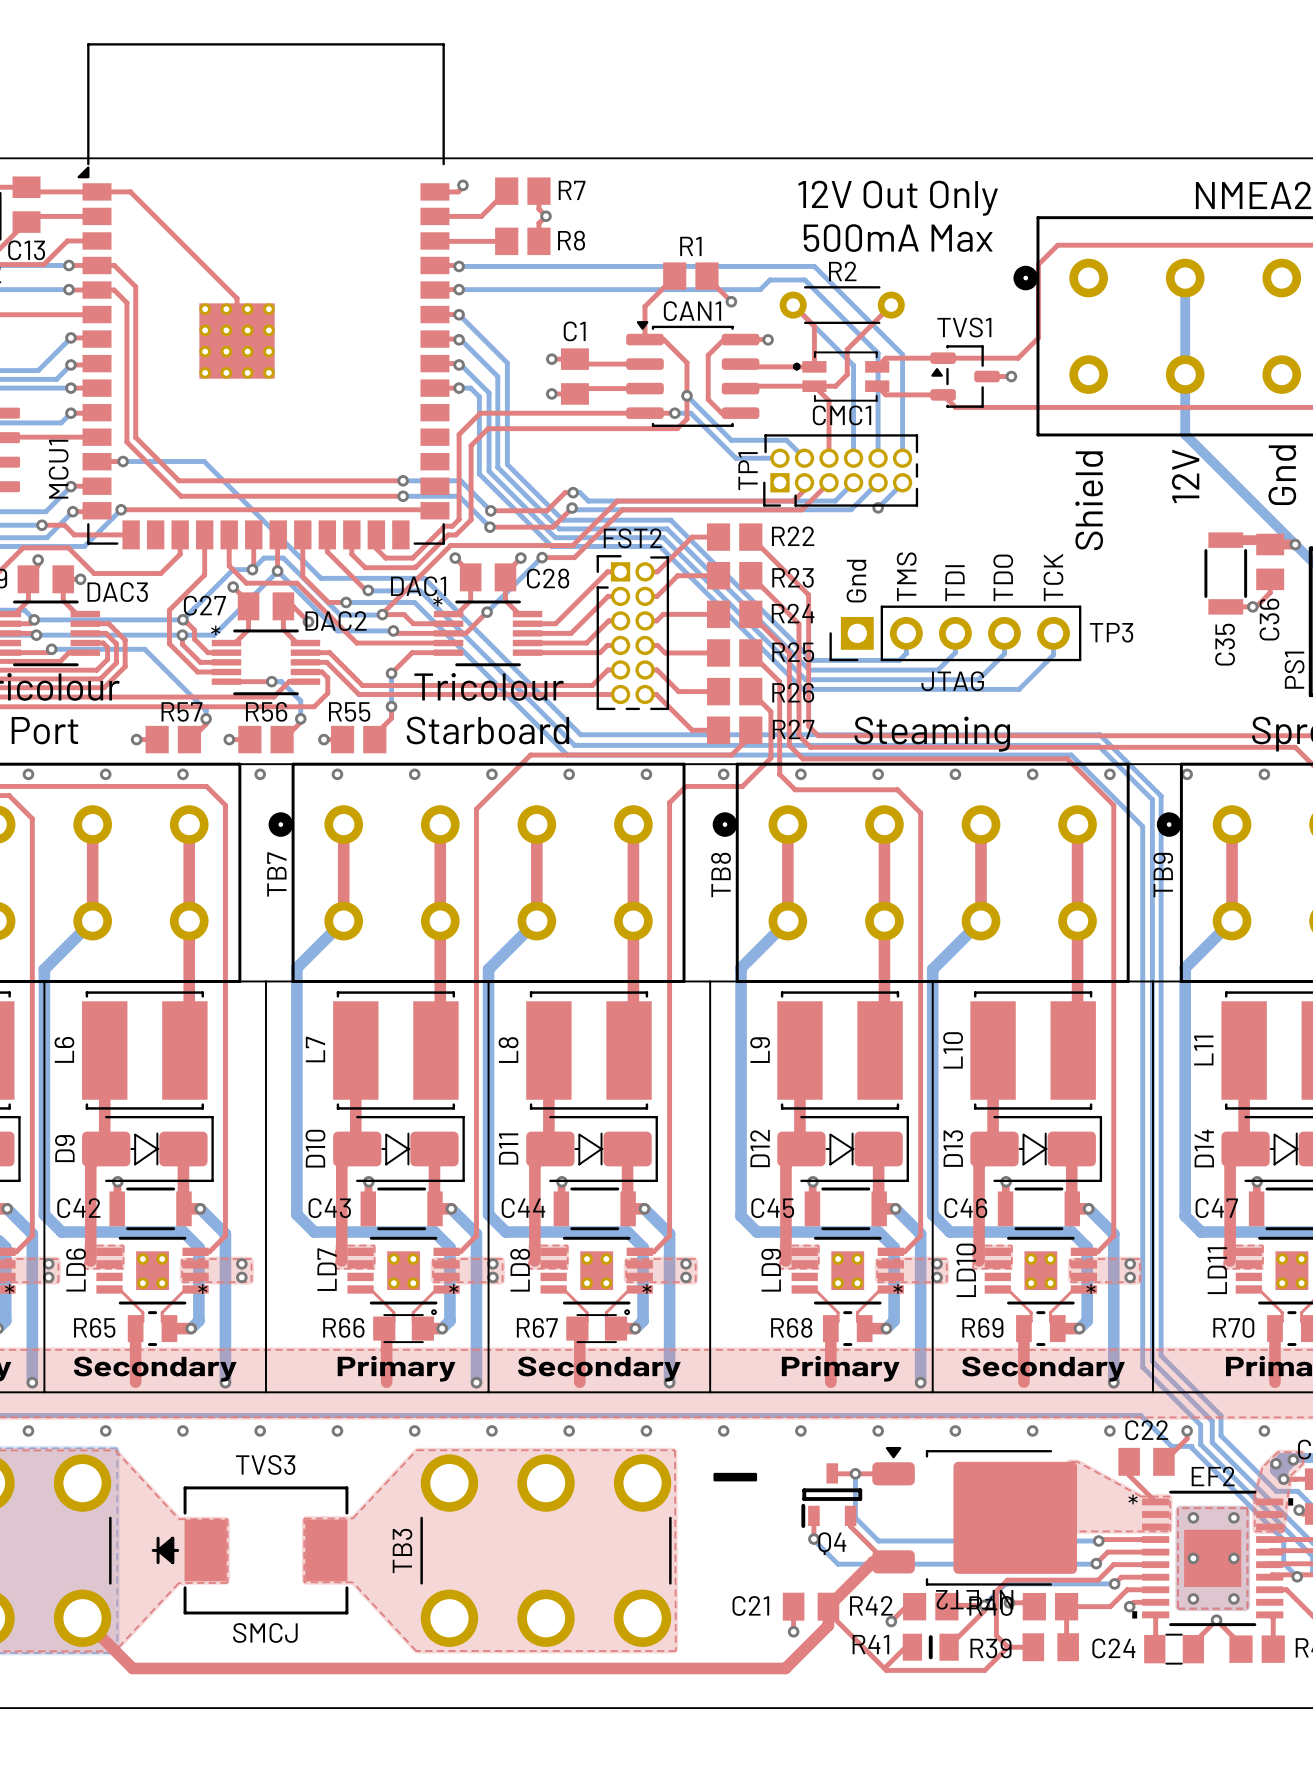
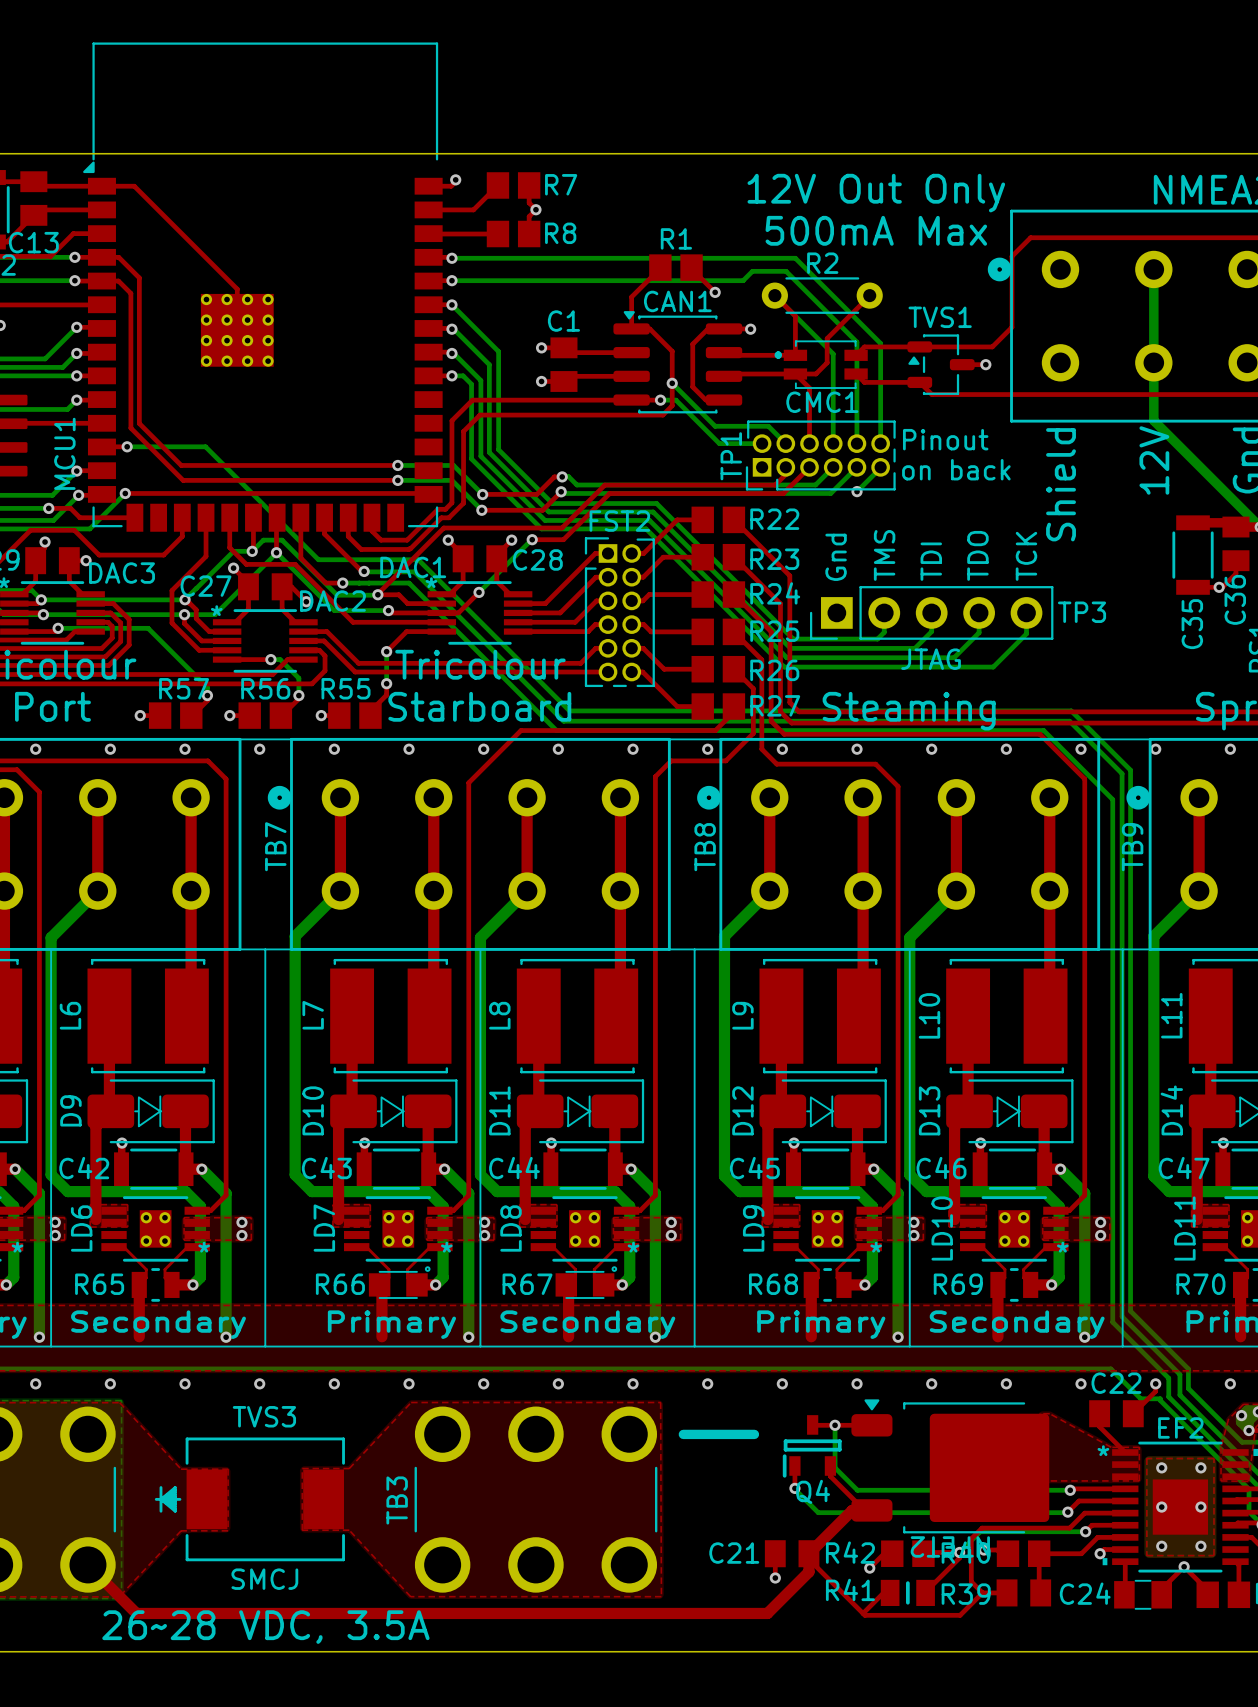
text: none -> Pinout (945, 439)
text: none -> on back (956, 469)
text: none -> 26~28 VDC, 3.5A (265, 1627)

